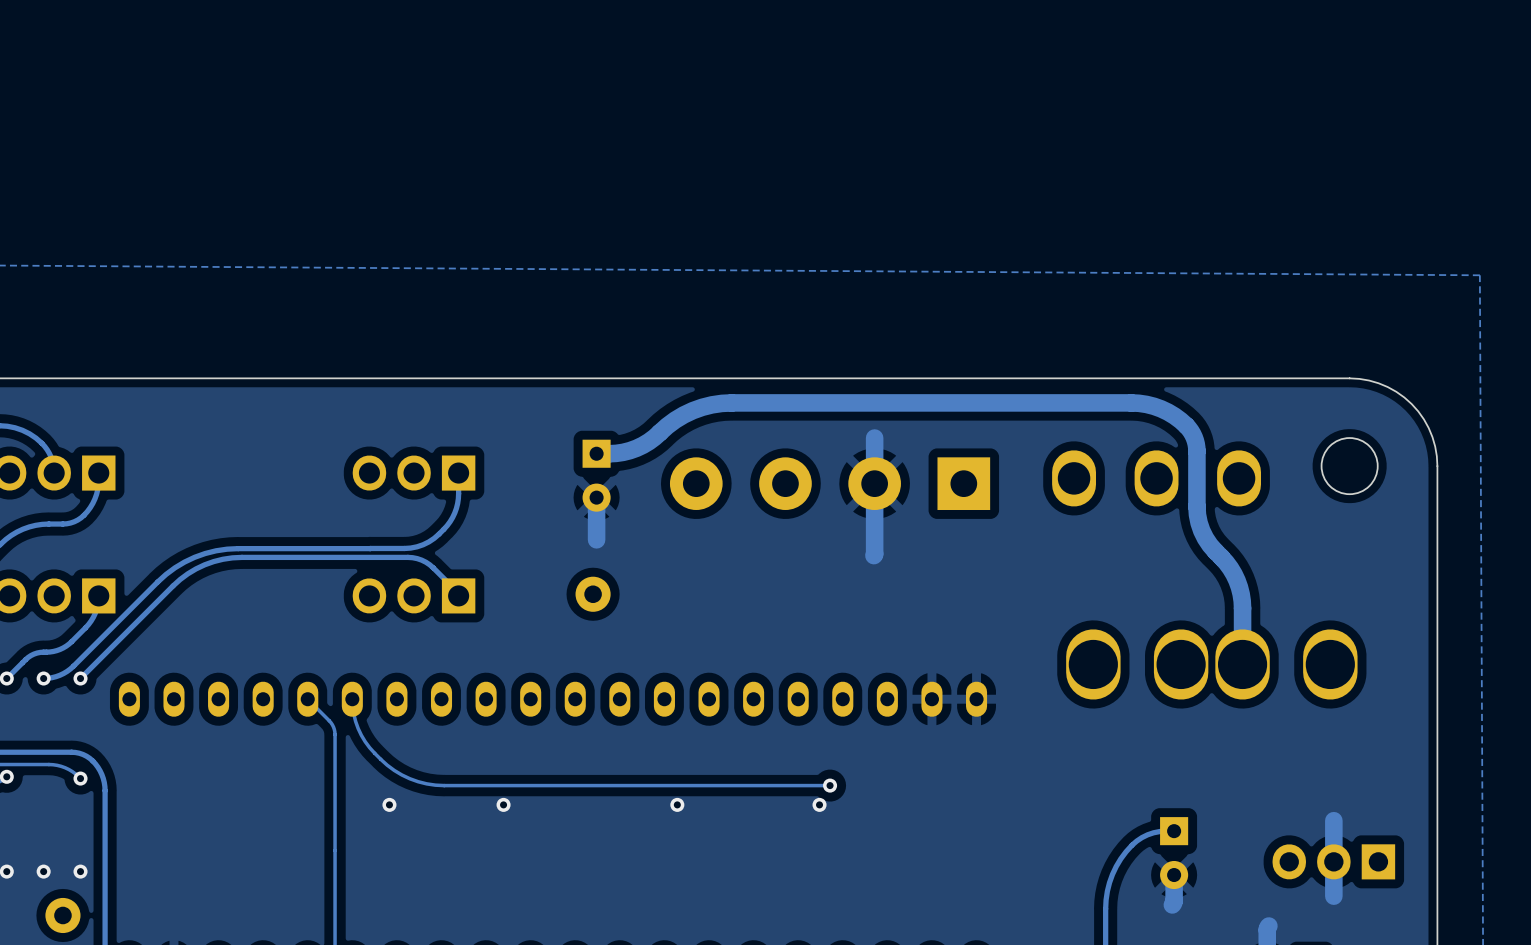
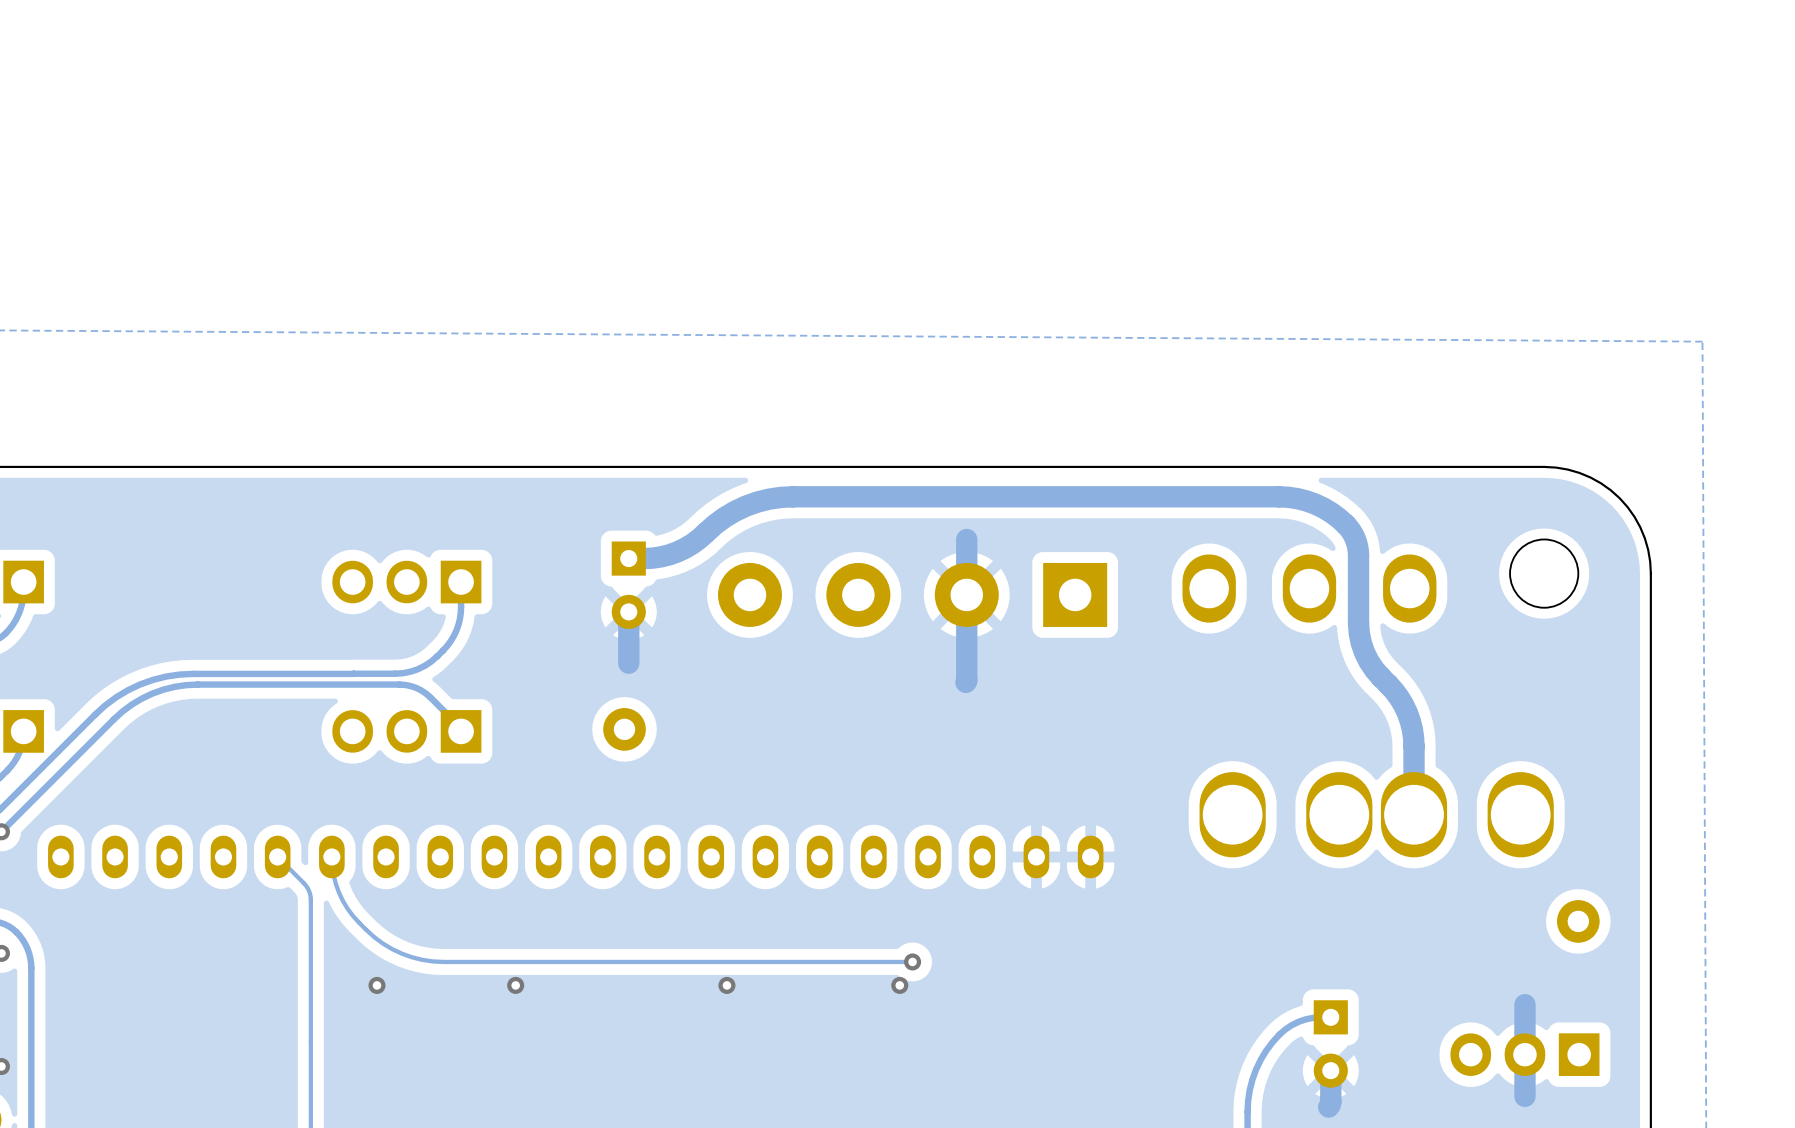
part: none -> (1578, 921)

